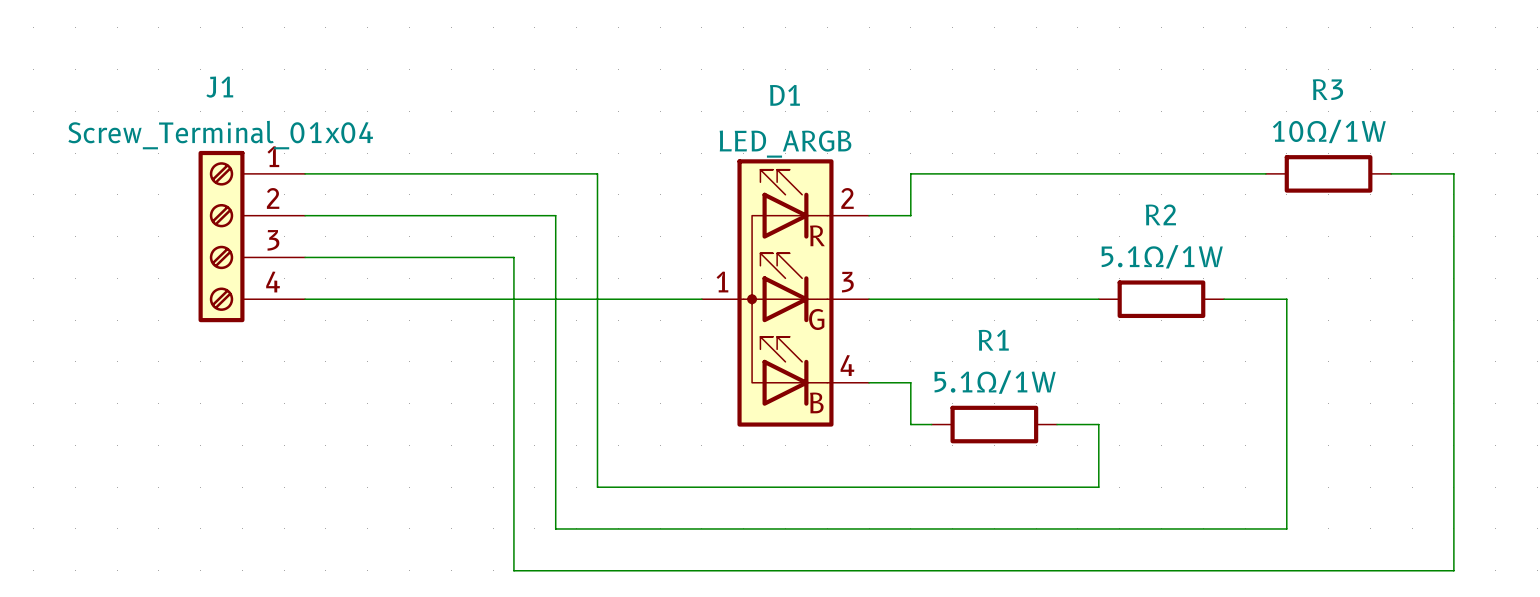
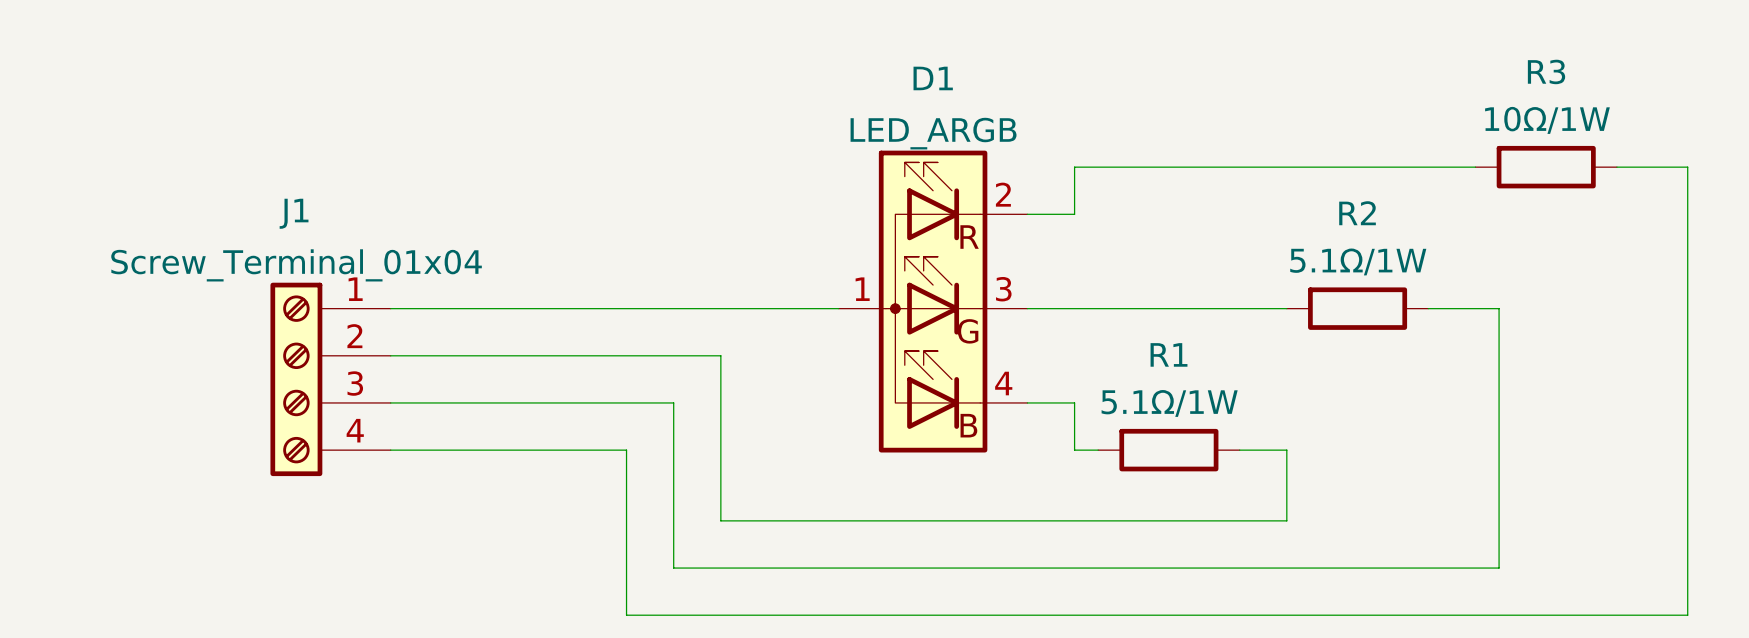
wire: (305, 173) (597, 173) (597, 341) -> (390, 355) (720, 355)
wire: (305, 215) (555, 215) (555, 382) -> (390, 402) (673, 402)
J1 position: (251, 236) -> (330, 379)
wire: (305, 257) (513, 257) (513, 424) -> (390, 450) (626, 450)

